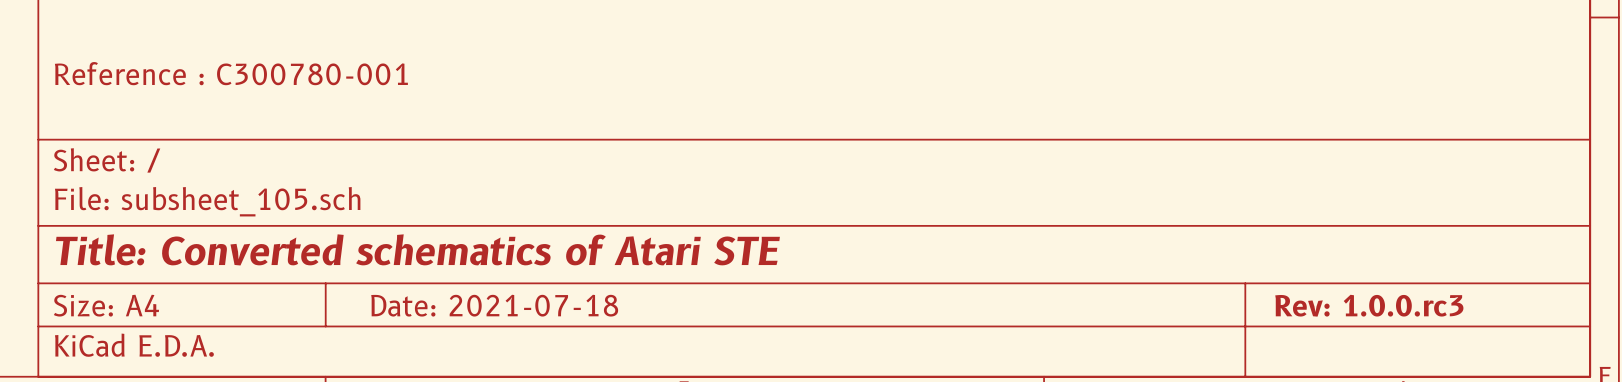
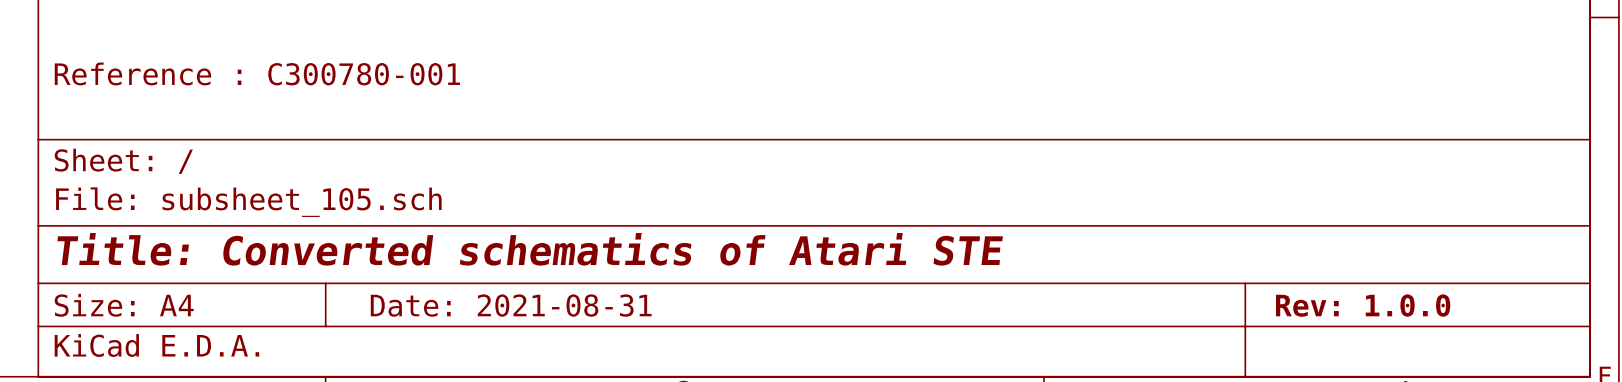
title block: Date: 2021-07-18 (494, 305) -> Date: 2021-08-31 (511, 305)
title block: Rev: 1.0.0.rc3 (1369, 305) -> Rev: 1.0.0 (1363, 305)

